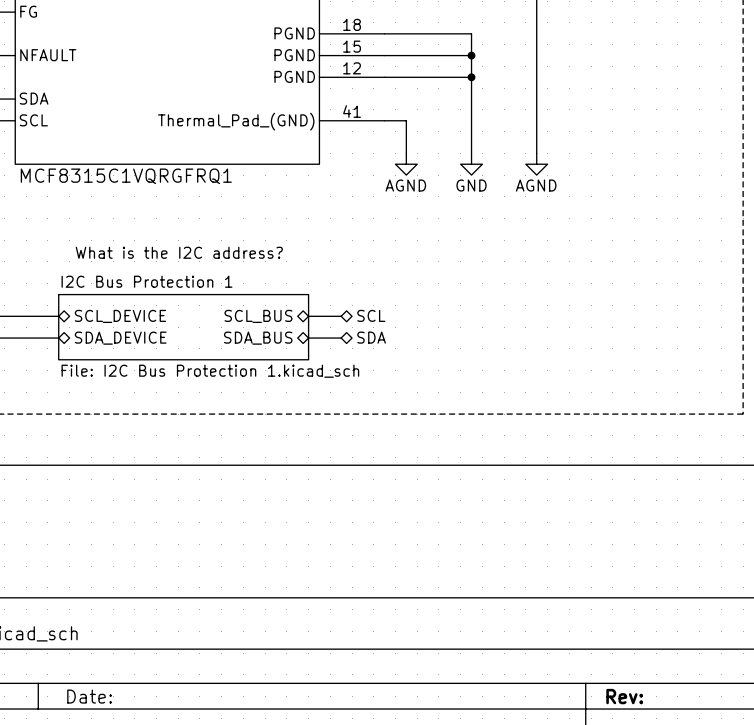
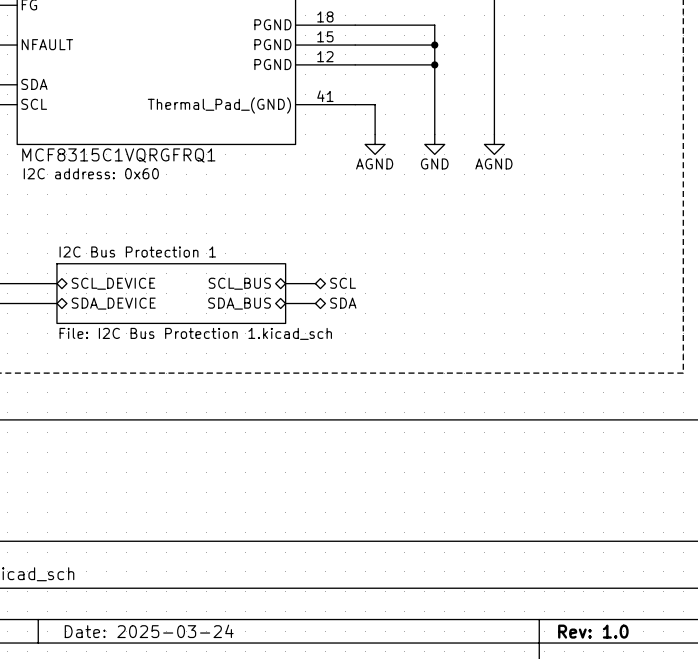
text: none -> I2C address: 0x60 (91, 173)
text: What is the I2C address? (179, 252) -> none
title block: Date: (89, 696) -> Date: 2025-03-24 (149, 631)
title block: Rev: (624, 696) -> Rev: 1.0 (593, 631)

